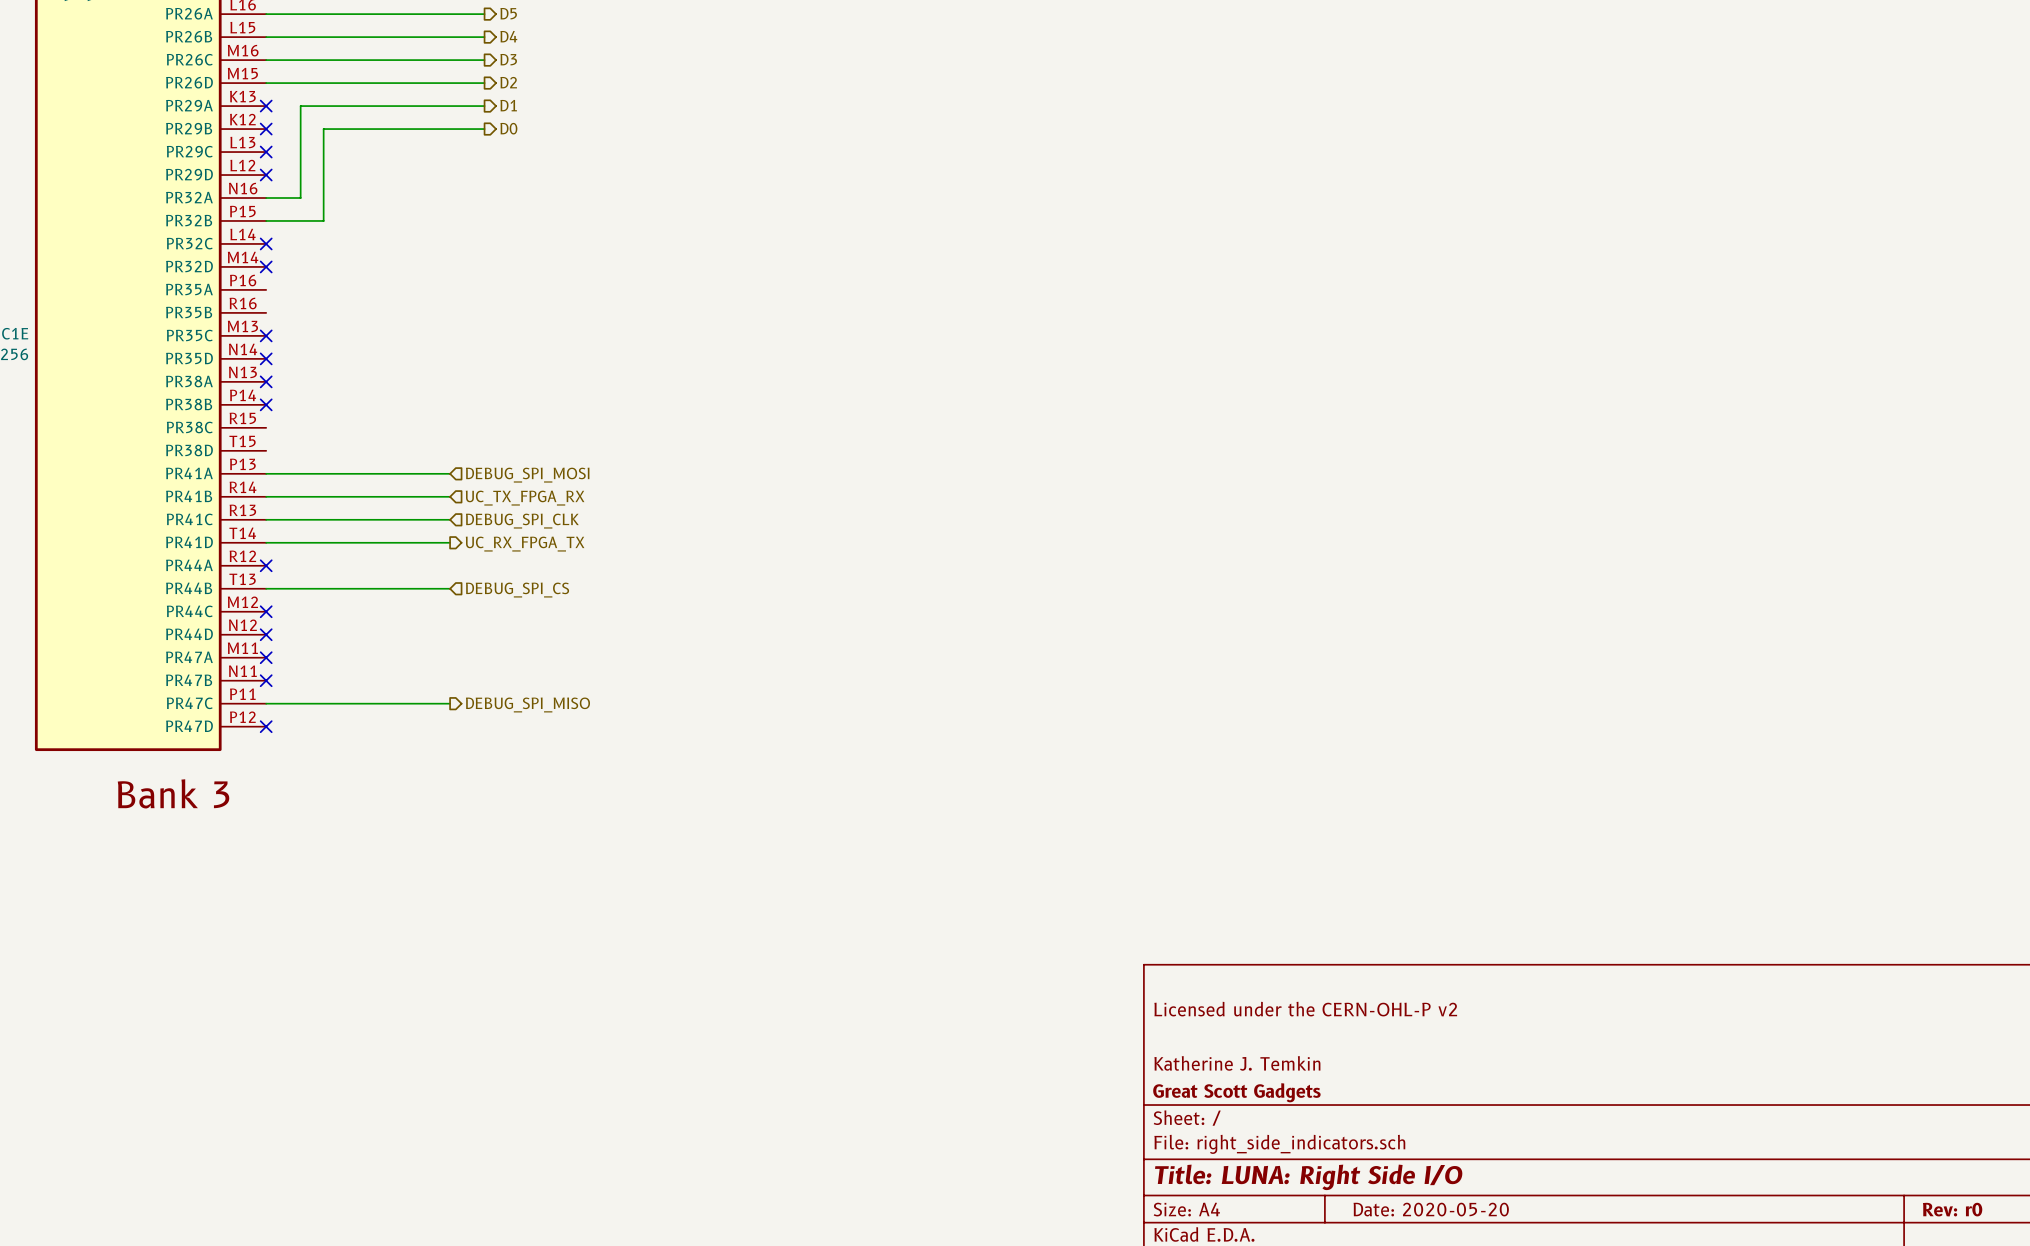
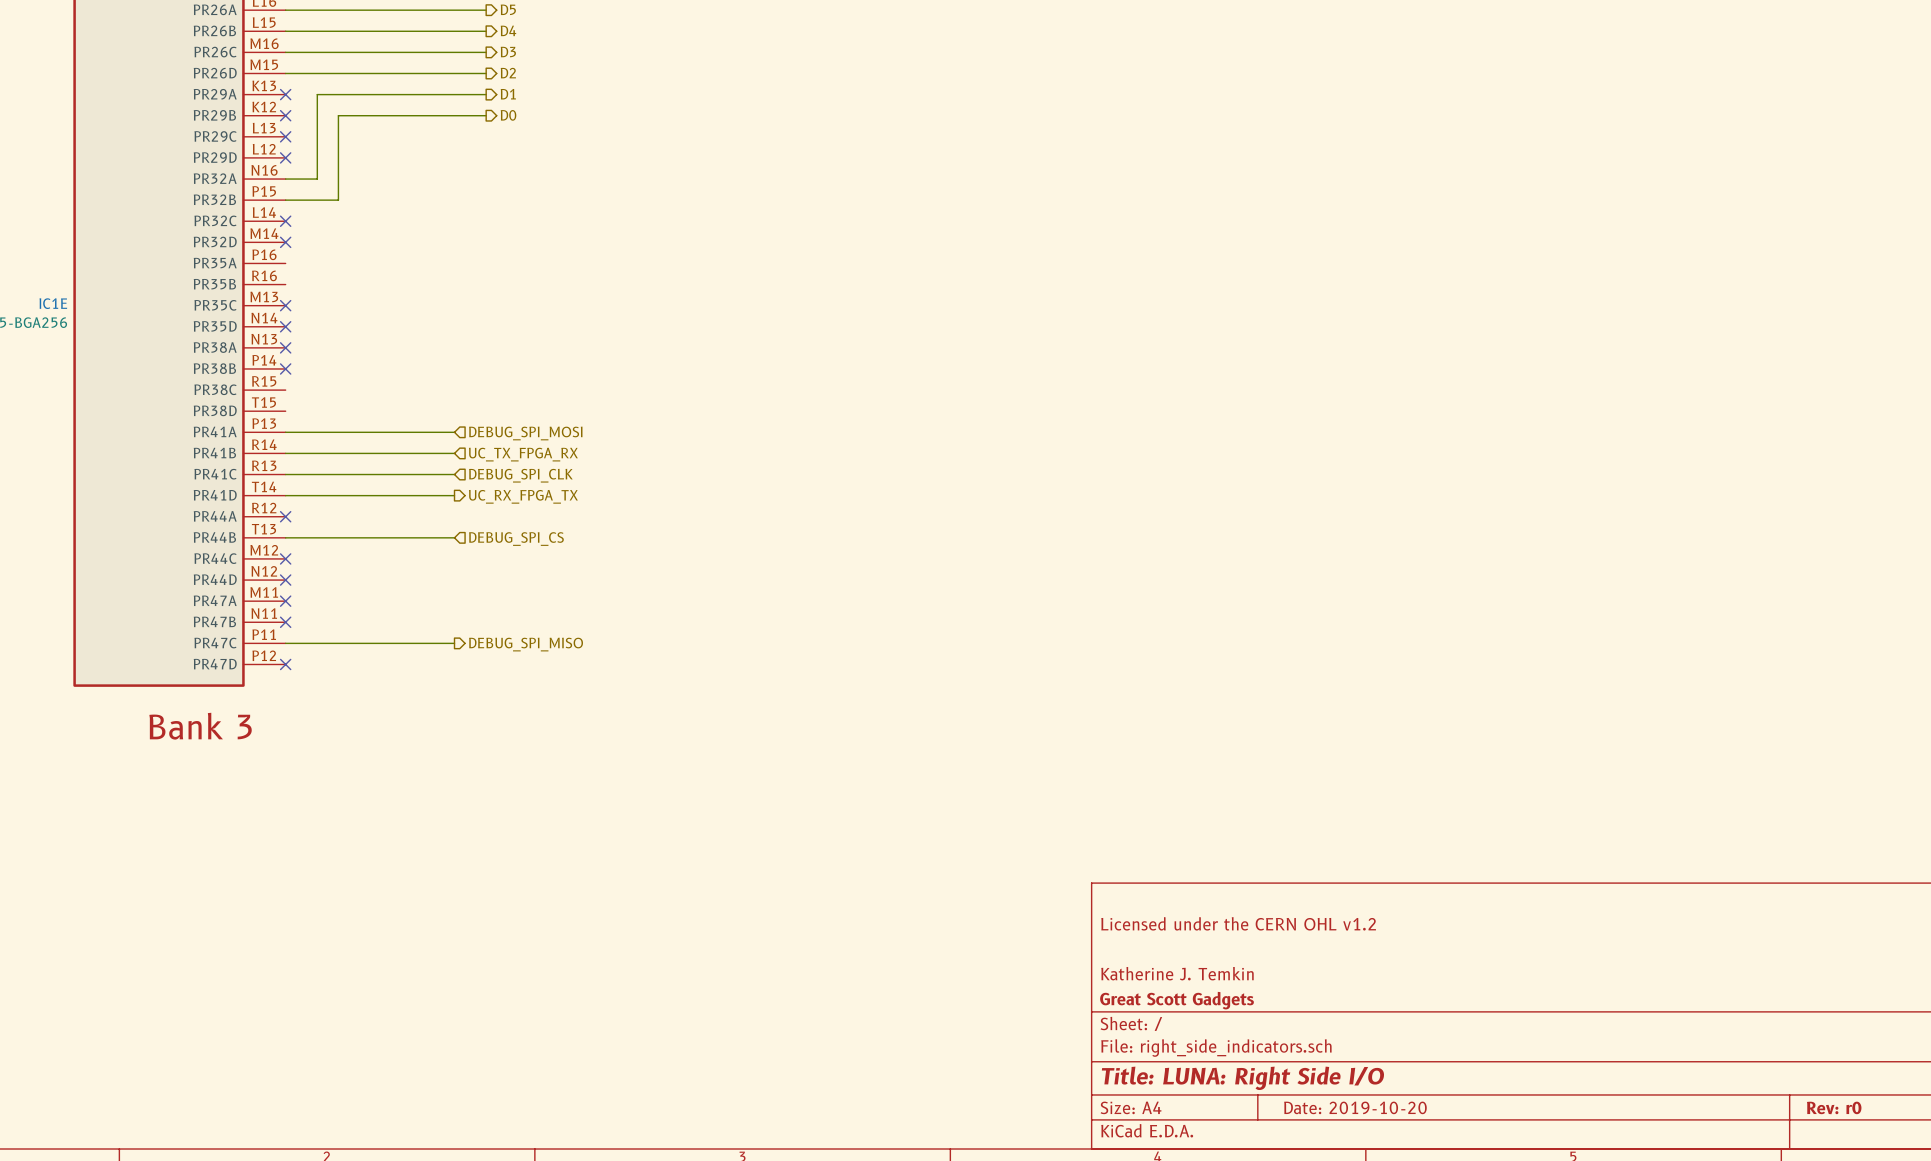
title block: Licensed under the CERN-OHL-P v2 (1305, 1009) -> Licensed under the CERN OHL v1.2 (1238, 923)
title block: Date: 2020-05-20 (1431, 1209) -> Date: 2019-10-20 (1355, 1107)

